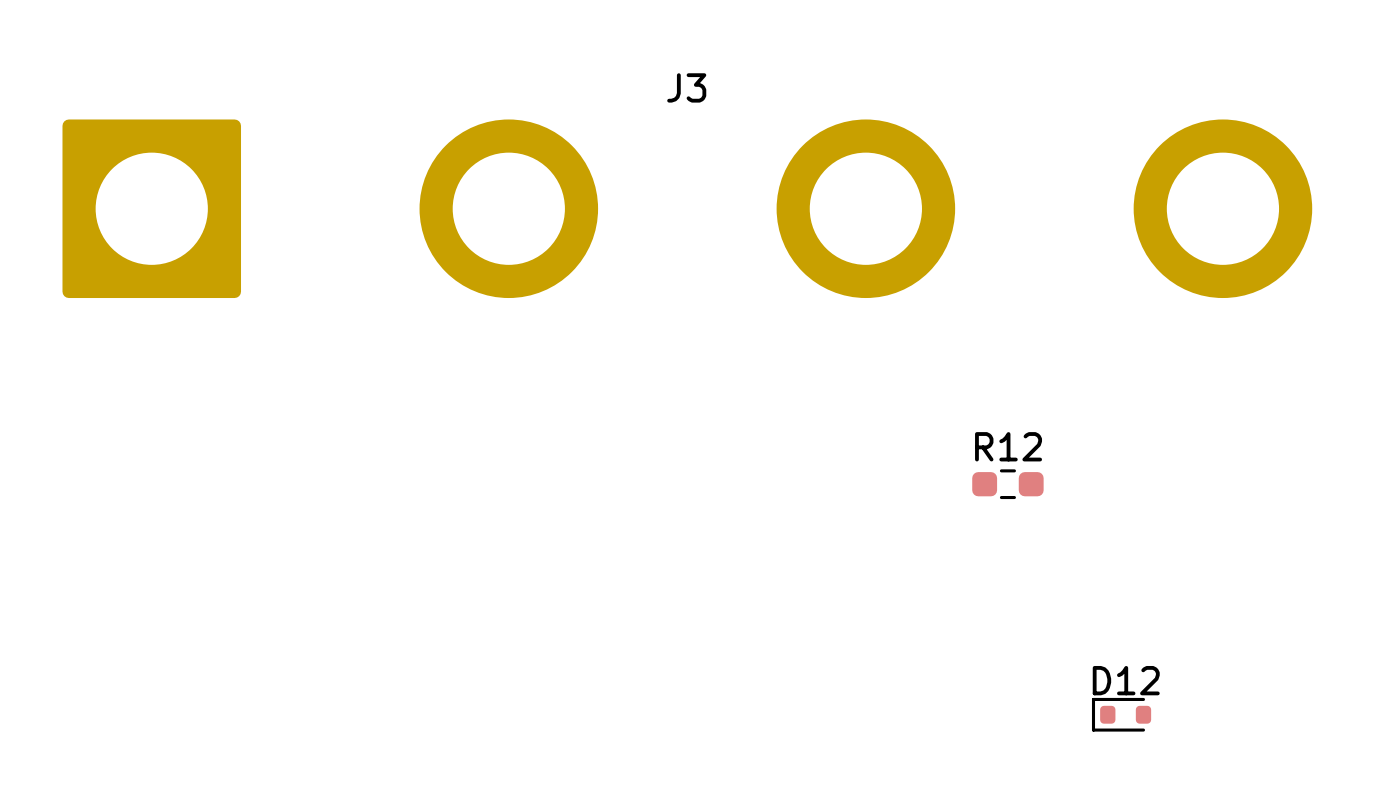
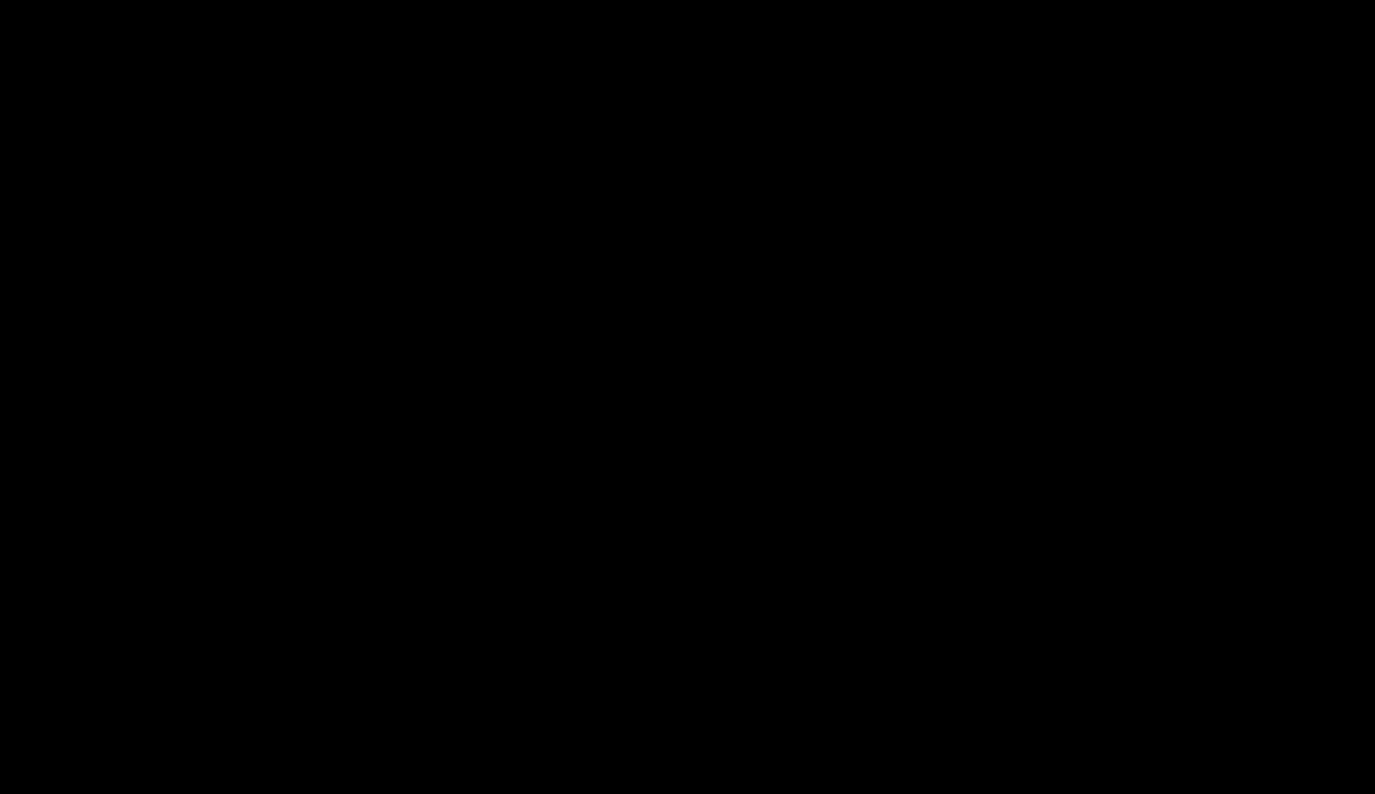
J3: (687, 208) -> none
R12: (1007, 484) -> none
D12: (1121, 714) -> none

